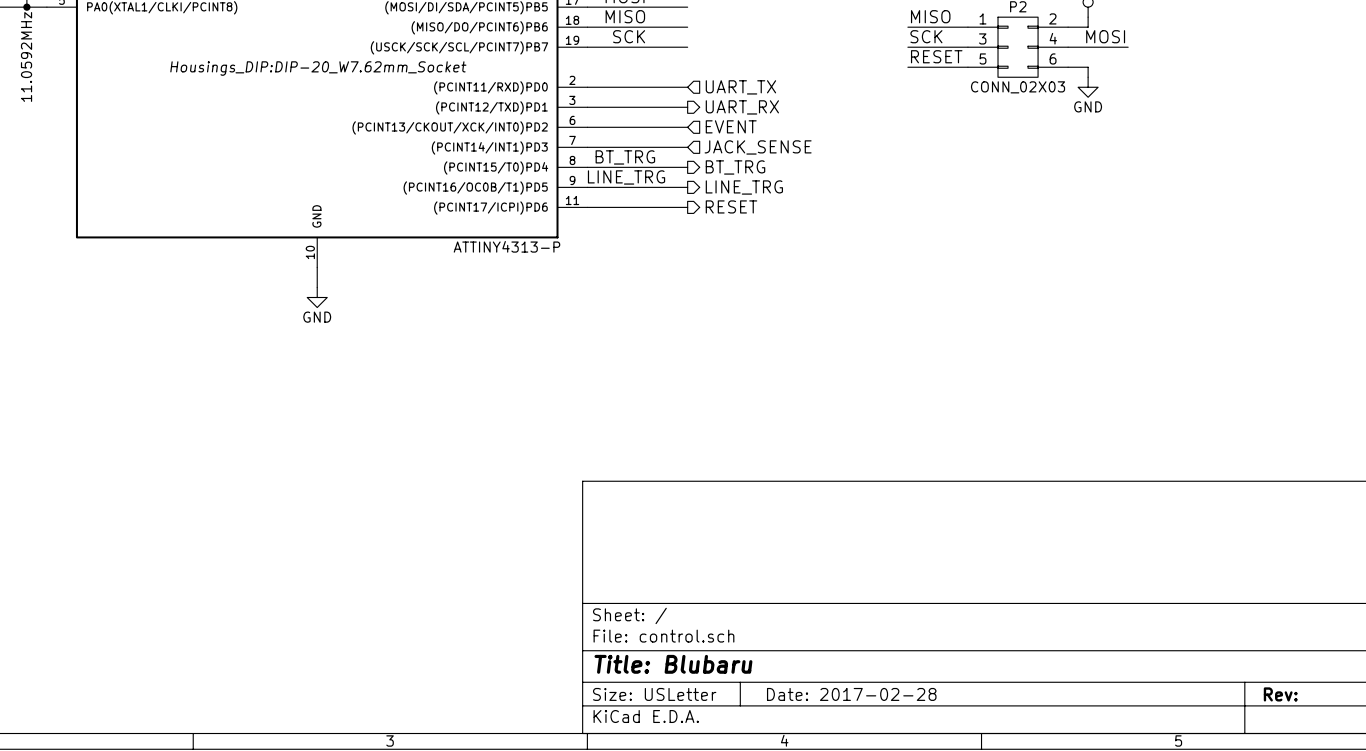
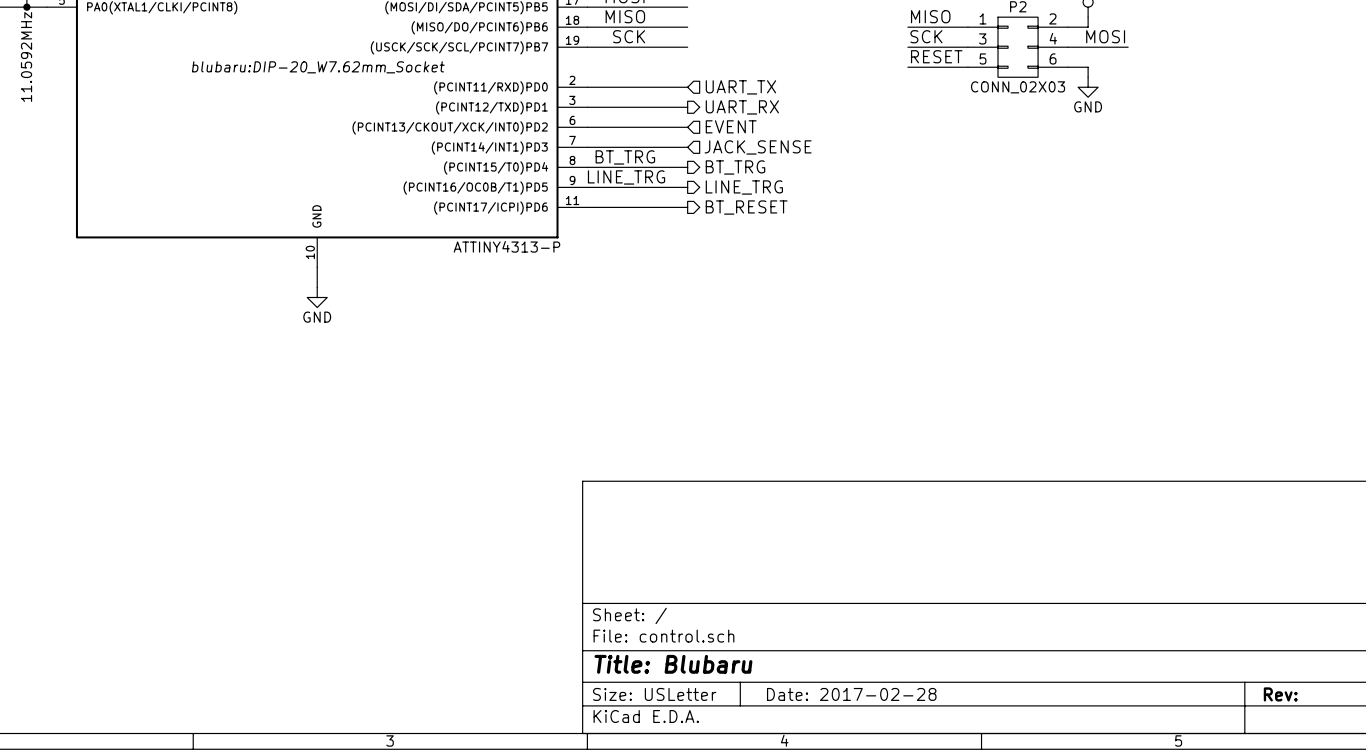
part text: Housings_DIP:DIP-20_W7.62mm_Socket (318, 68) -> blubaru:DIP-20_W7.62mm_Socket (318, 67)
hierarchical label: RESET (731, 206) -> BT_RESET (746, 207)

